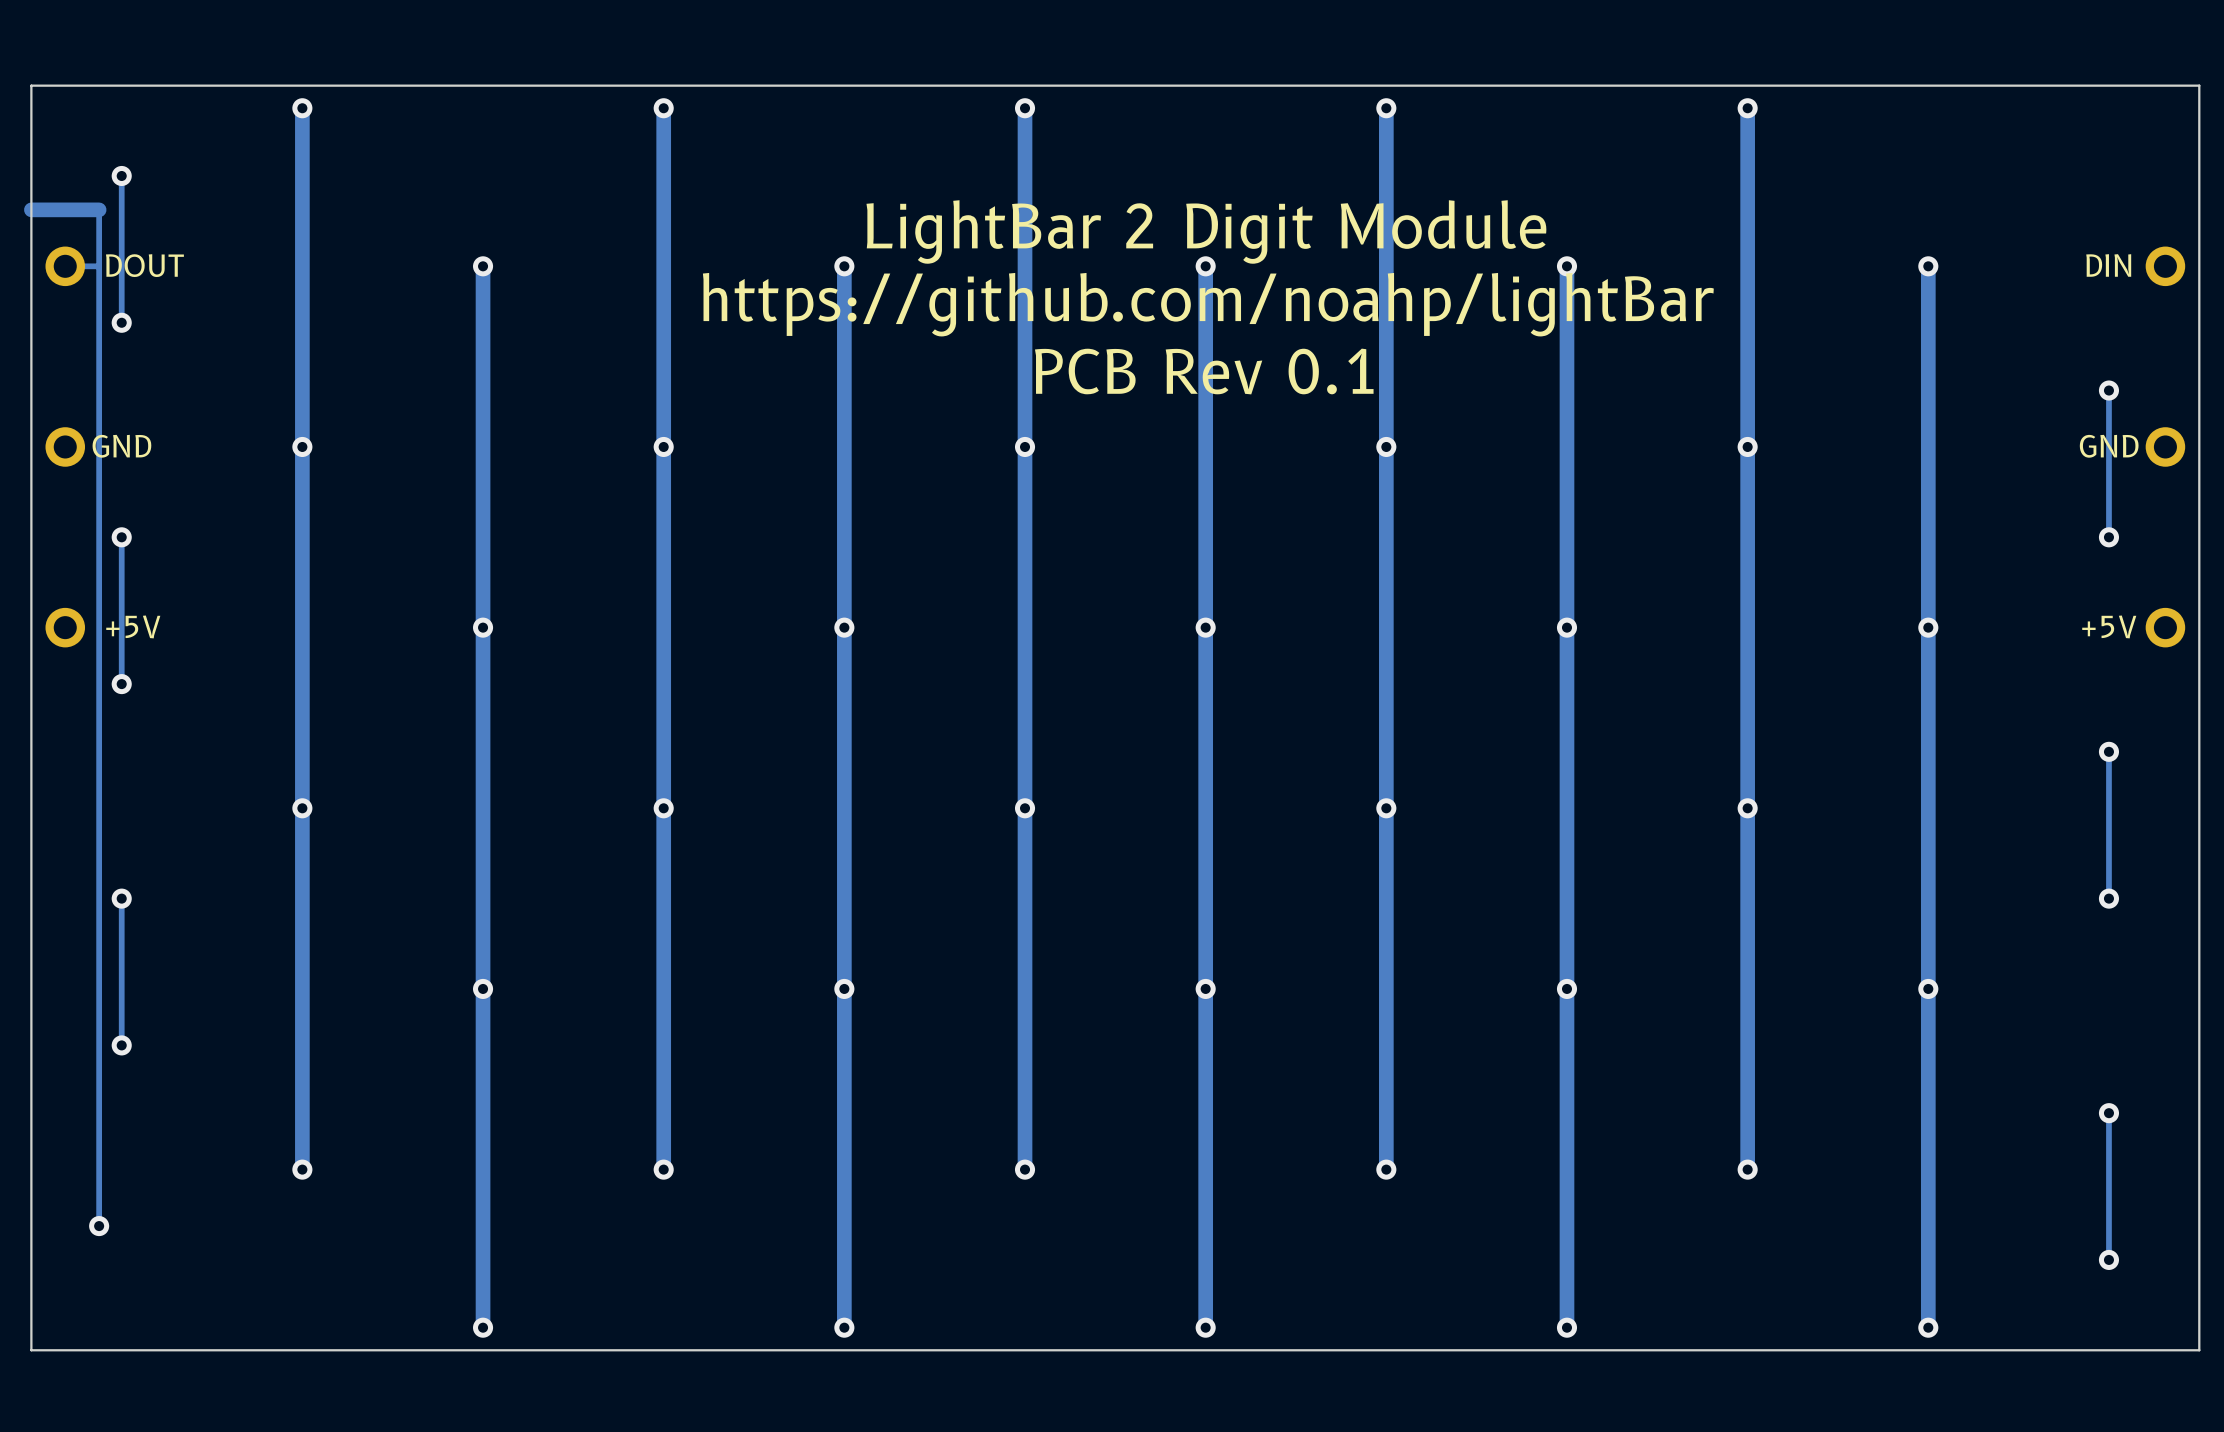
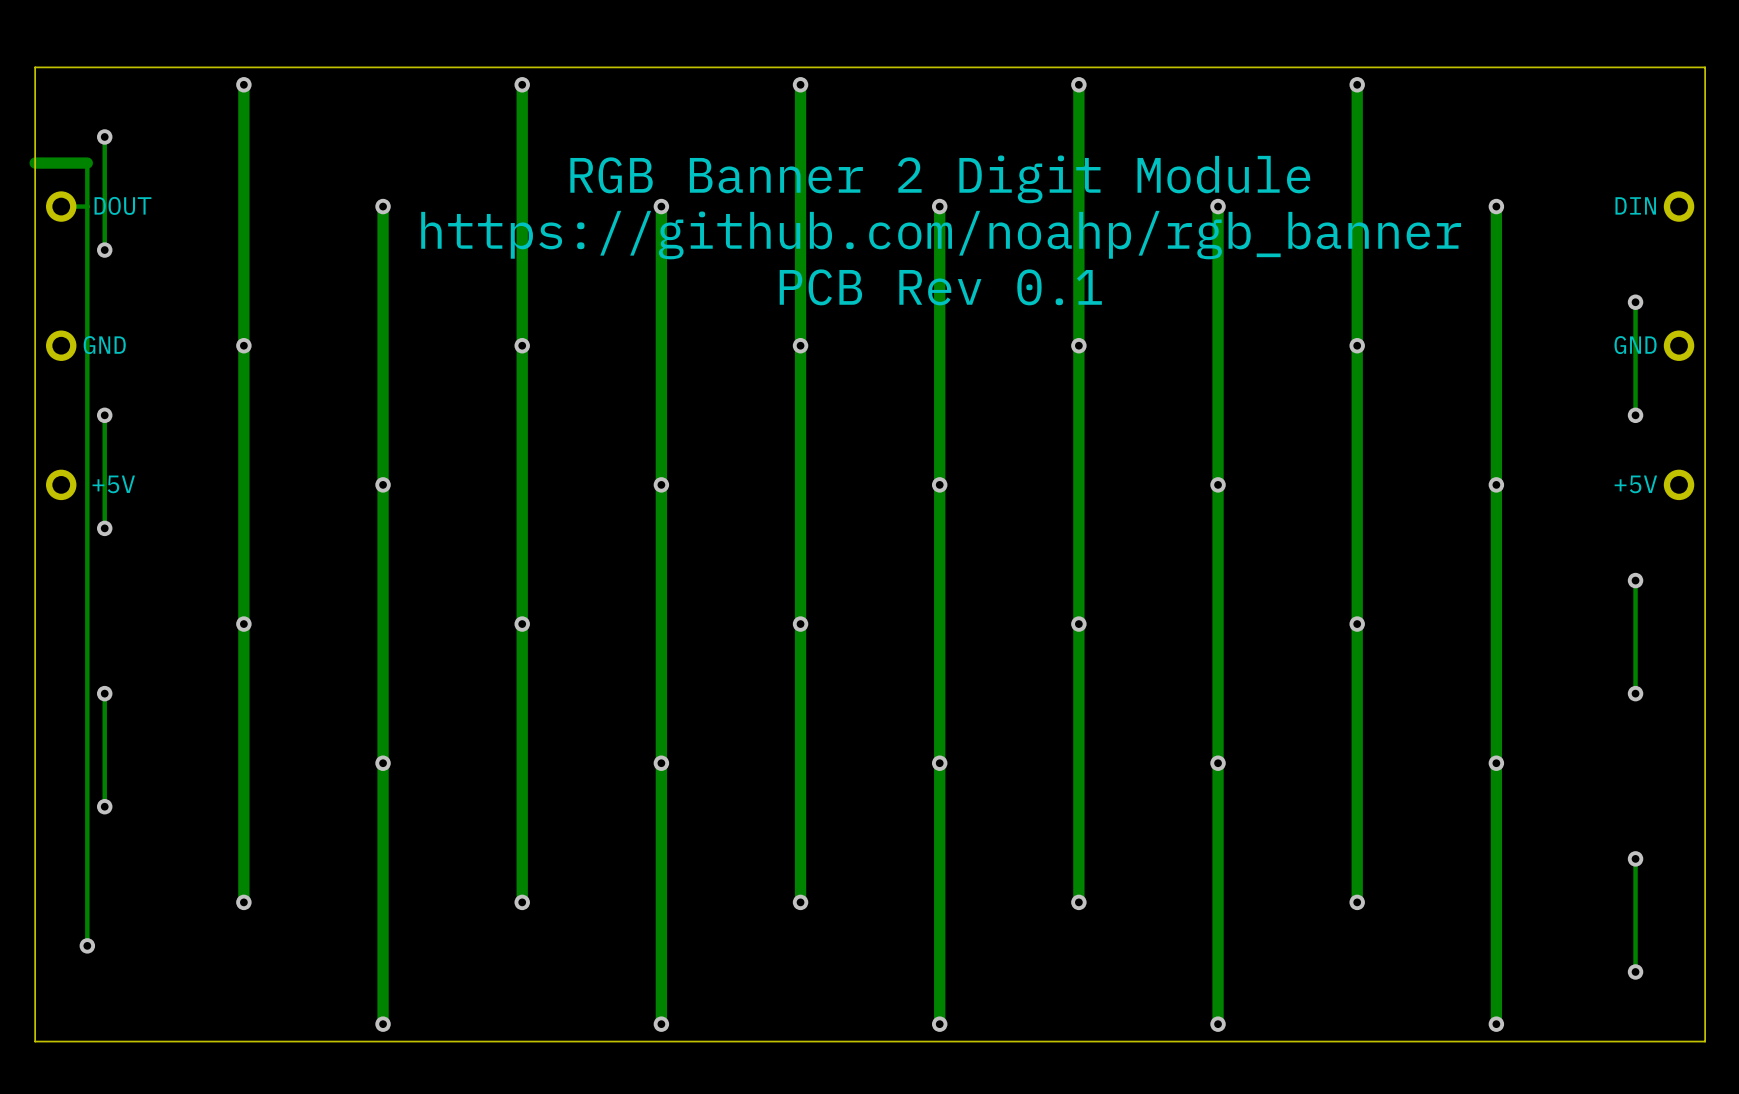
text: LightBar 2 Digit Module (1206, 231) -> RGB Banner 2 Digit Module (940, 179)
text: https://github.com/noahp/lightBar (1208, 304) -> https://github.com/noahp/rgb_banner (941, 235)

